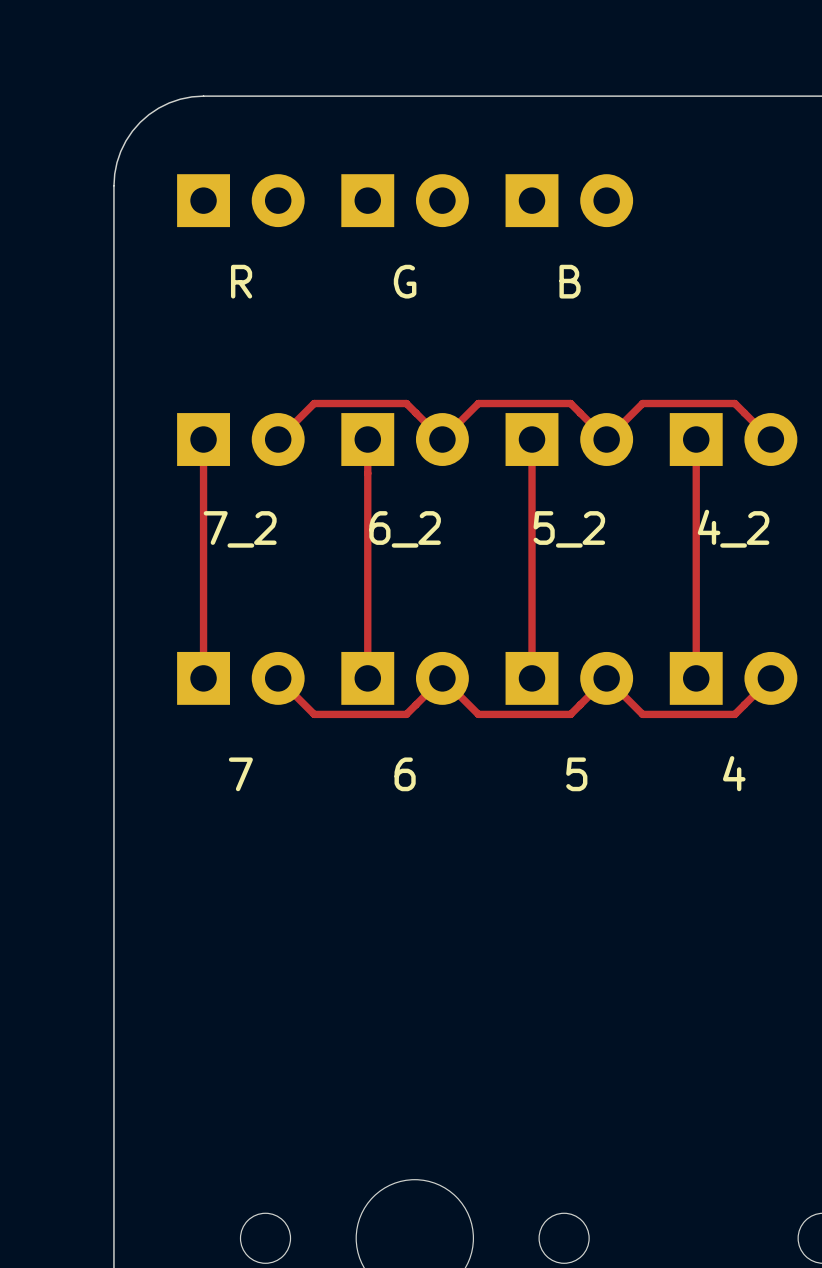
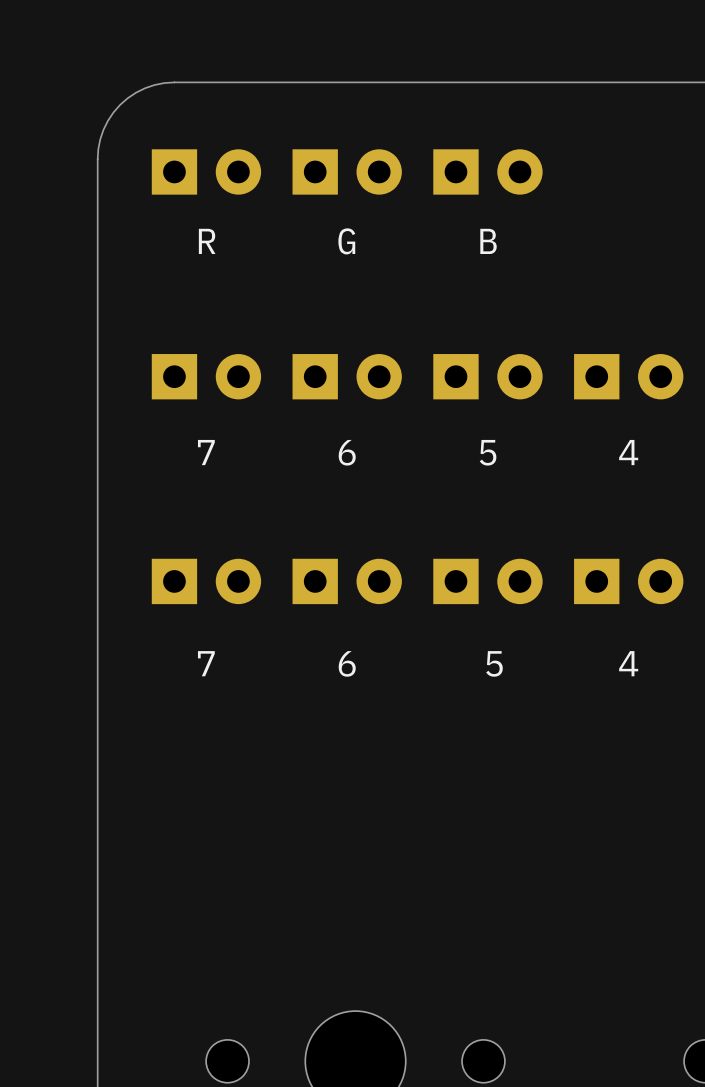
track: (203, 439) (203, 678) -> none
track: (278, 439) (314, 403) (406, 403) (442, 439) (478, 403) (570, 403) (606, 439) (642, 403) (734, 403) (770, 439) -> none
track: (367, 439) (367, 678) -> none
track: (532, 439) (532, 678) -> none
track: (696, 439) (696, 678) -> none
4_2 name: 4_2 (733, 528) -> 4 (628, 452)
7_2 name: 7_2 (240, 529) -> 7 (206, 452)
6_2 name: 6_2 (405, 529) -> 6 (347, 452)
5_2 name: 5_2 (569, 529) -> 5 (488, 452)
track: (278, 678) (314, 714) (406, 714) (442, 678) (478, 714) (570, 714) (606, 678) (642, 714) (734, 714) (770, 678) -> none

